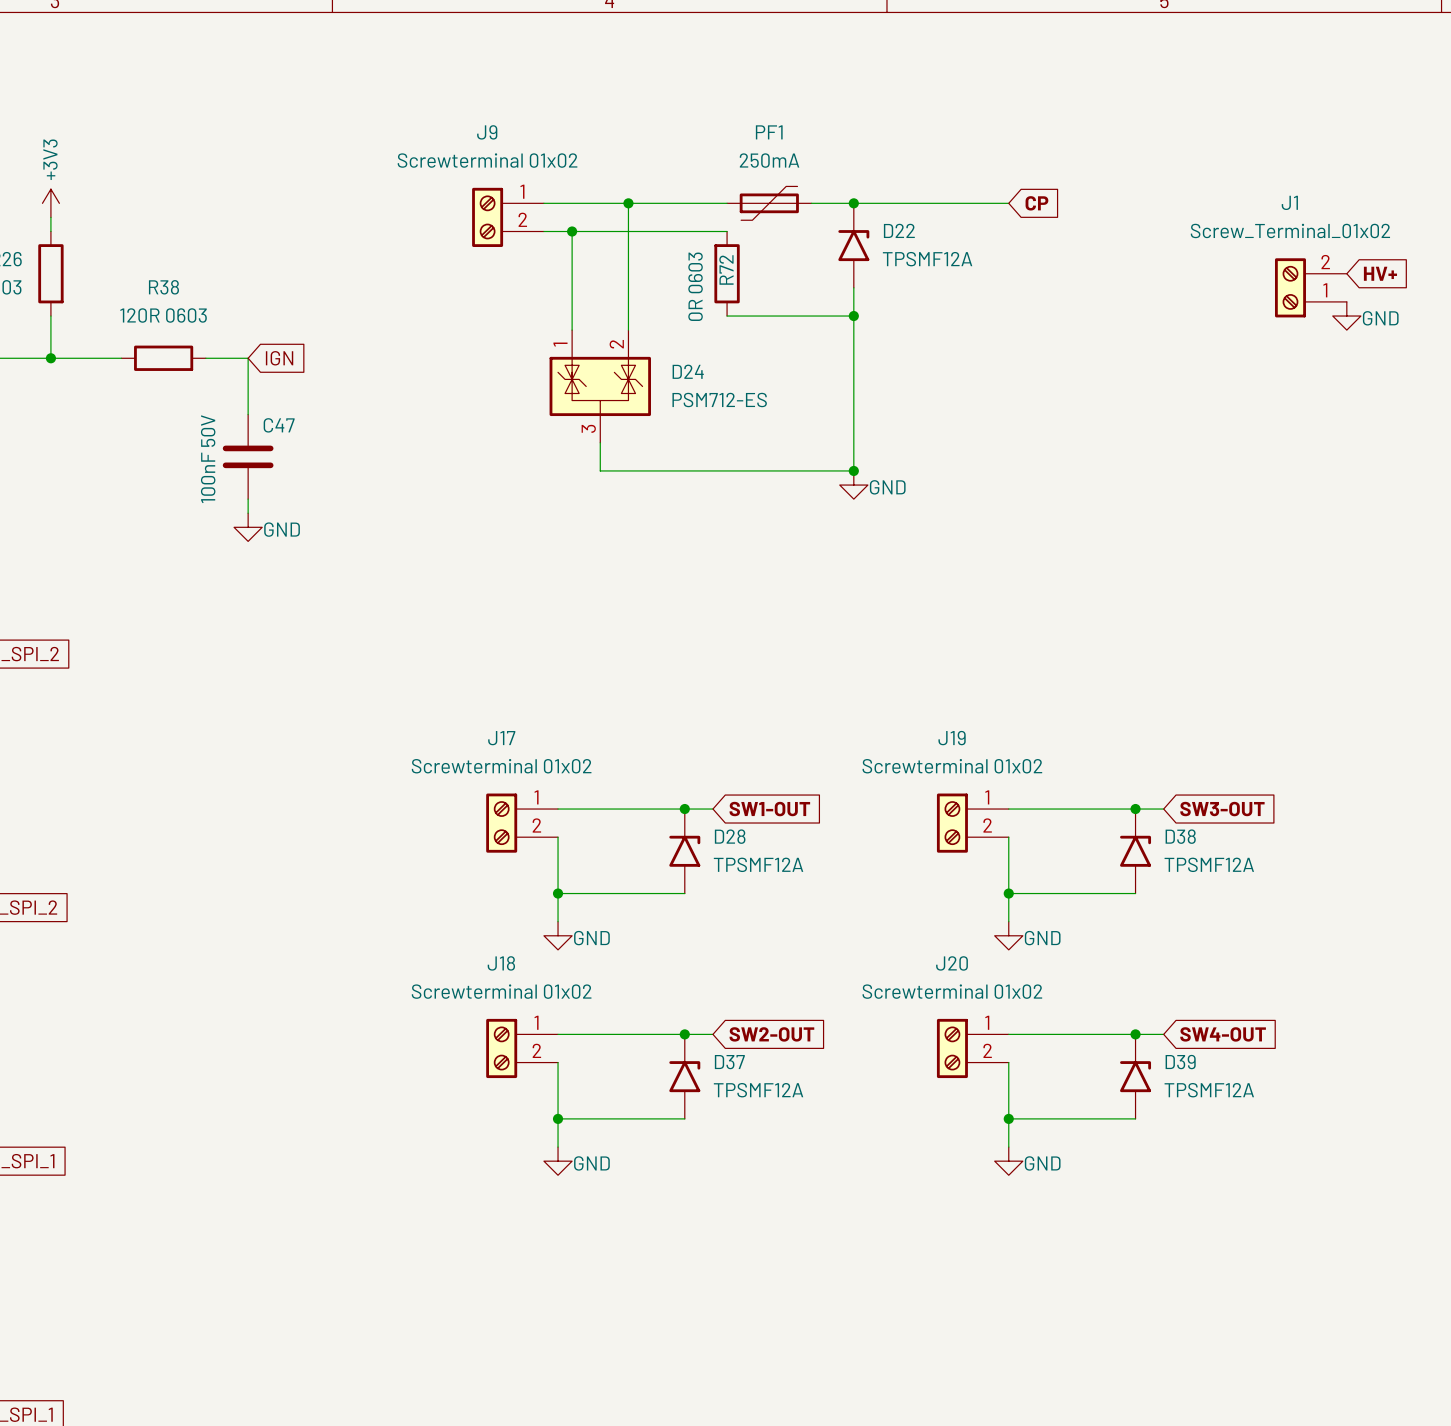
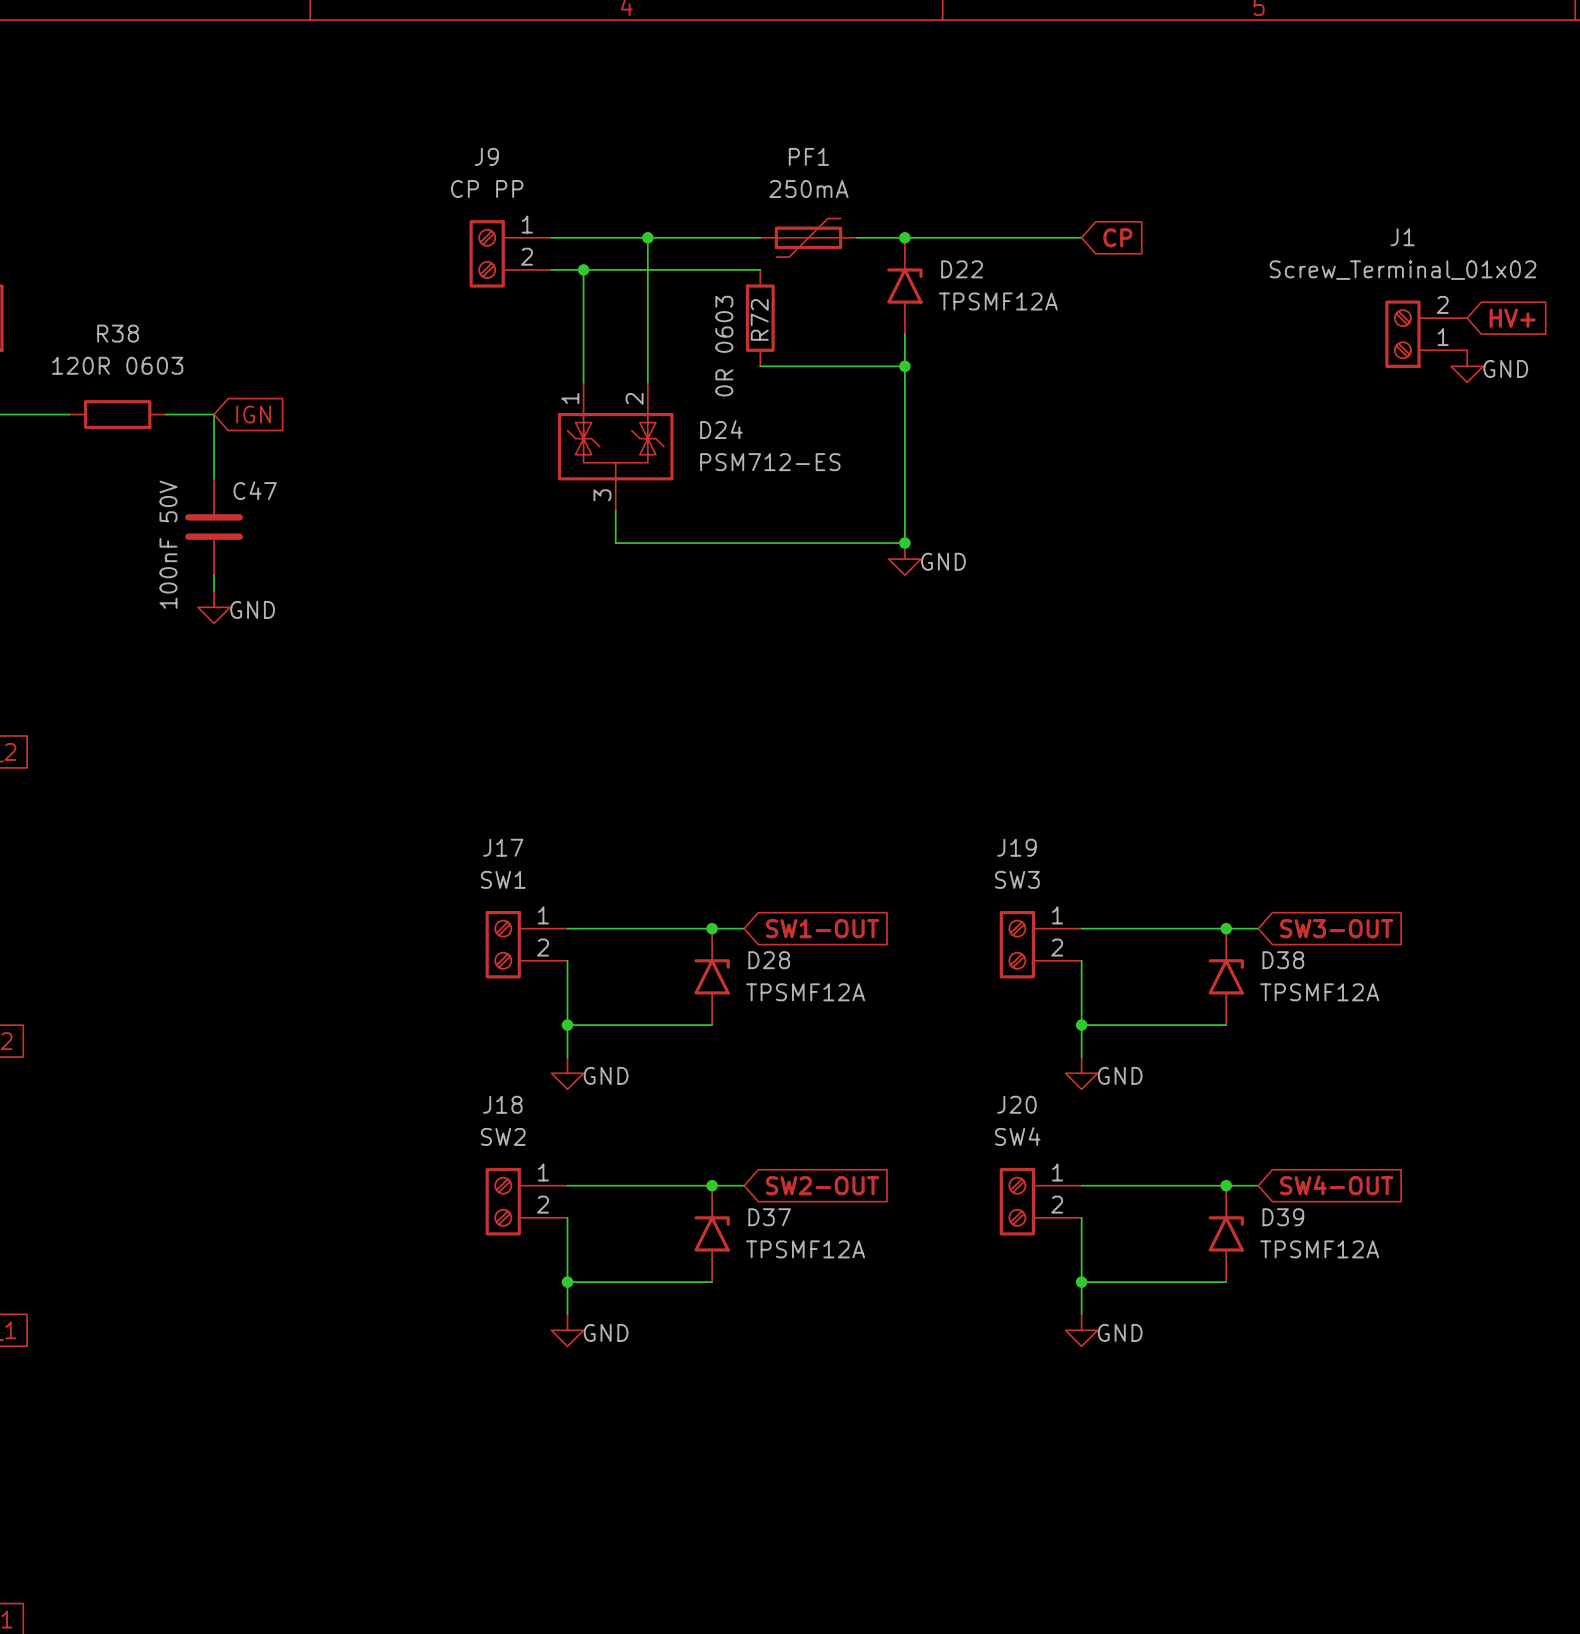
J9 value: Screwterminal 01x02 (487, 160) -> CP PP (487, 189)
J17 value: Screwterminal 01x02 (501, 766) -> SW1 (503, 879)
J19 value: Screwterminal 01x02 (952, 766) -> SW3 (1017, 879)
J18 value: Screwterminal 01x02 (501, 991) -> SW2 (503, 1136)
J20 value: Screwterminal 01x02 (952, 991) -> SW4 (1017, 1136)

